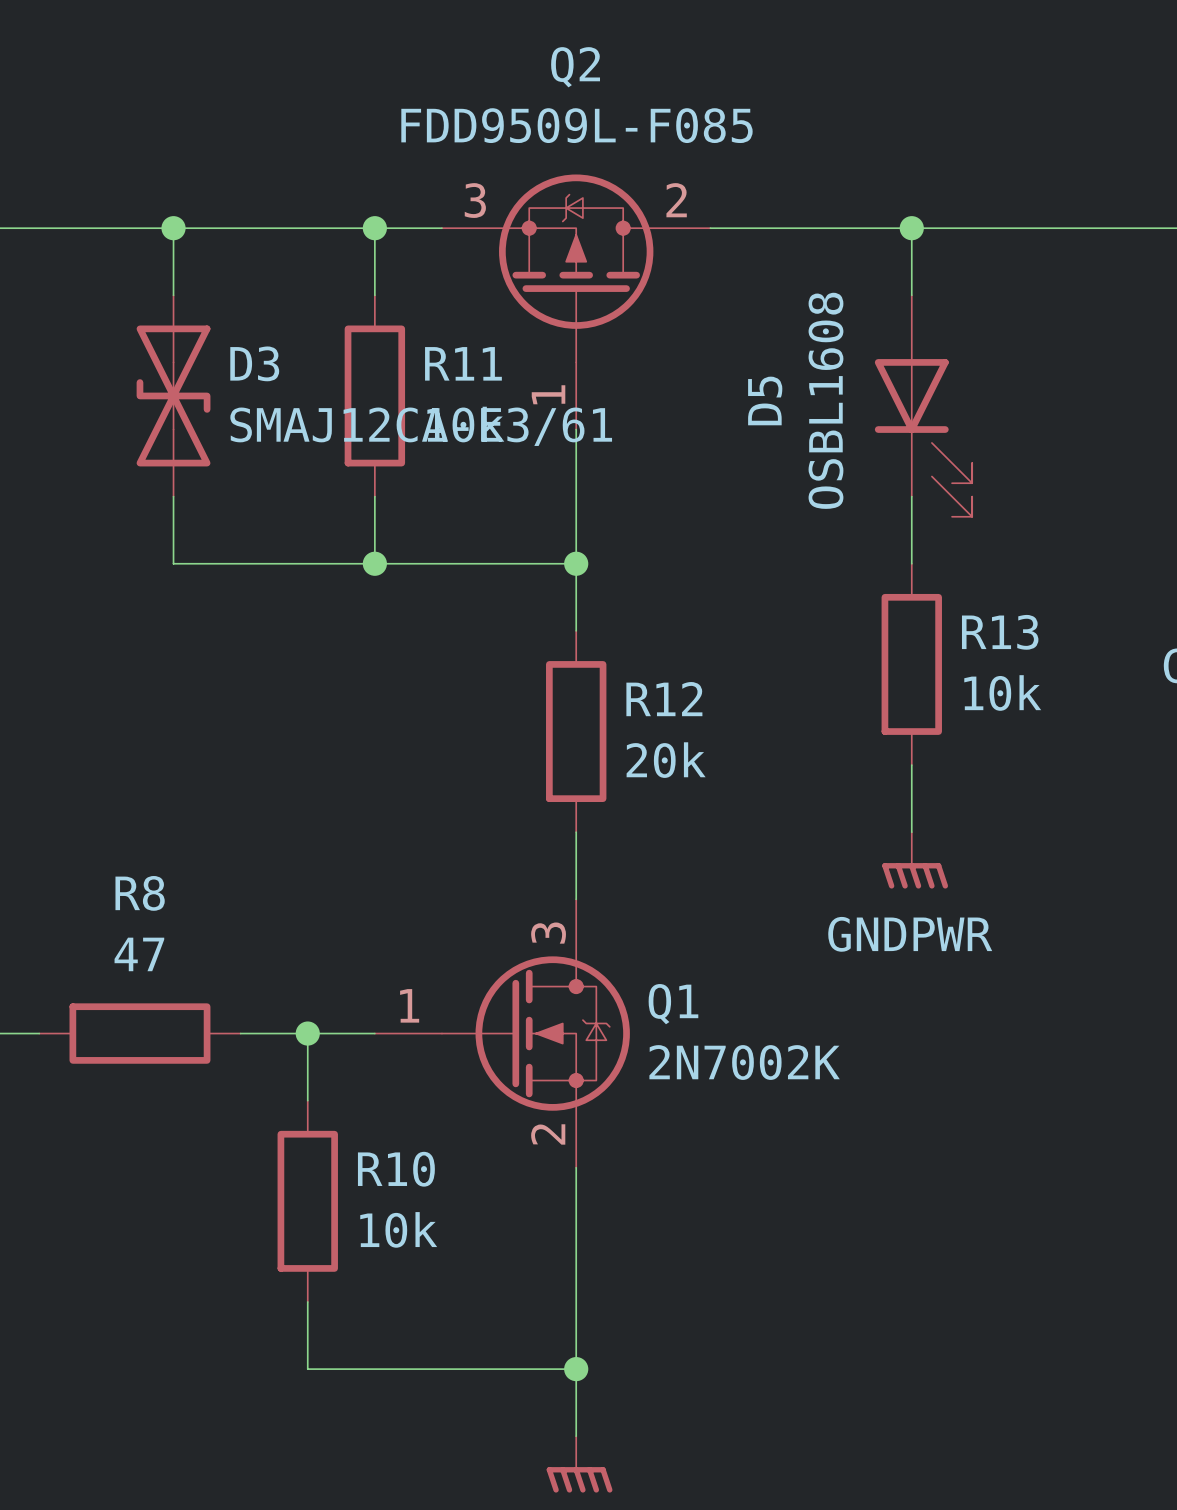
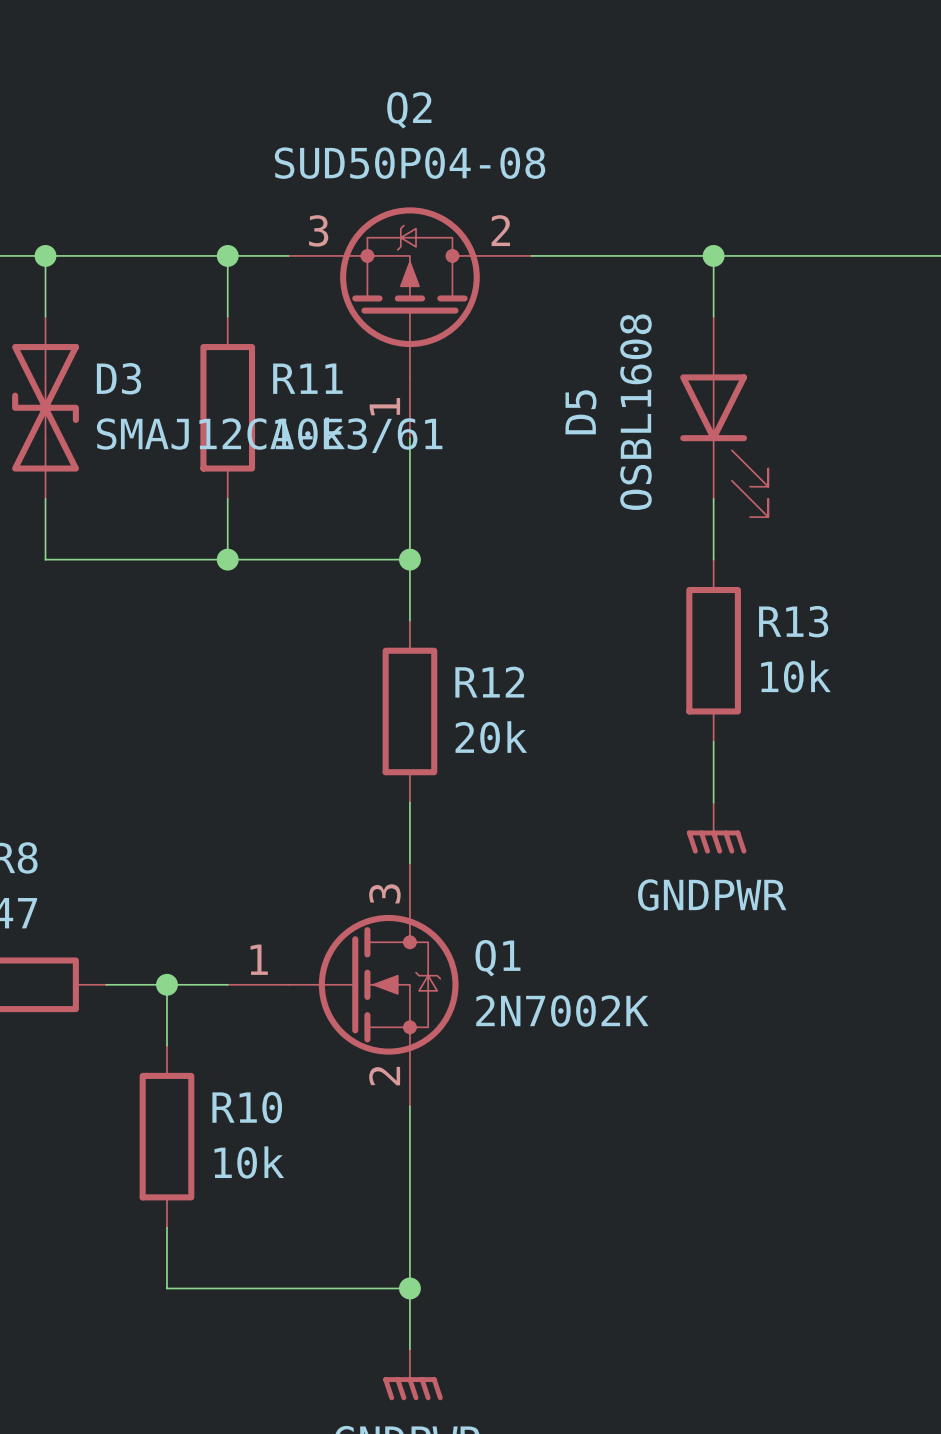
Q2 value: FDD9509L-F085 (576, 125) -> SUD50P04-08 (410, 163)

